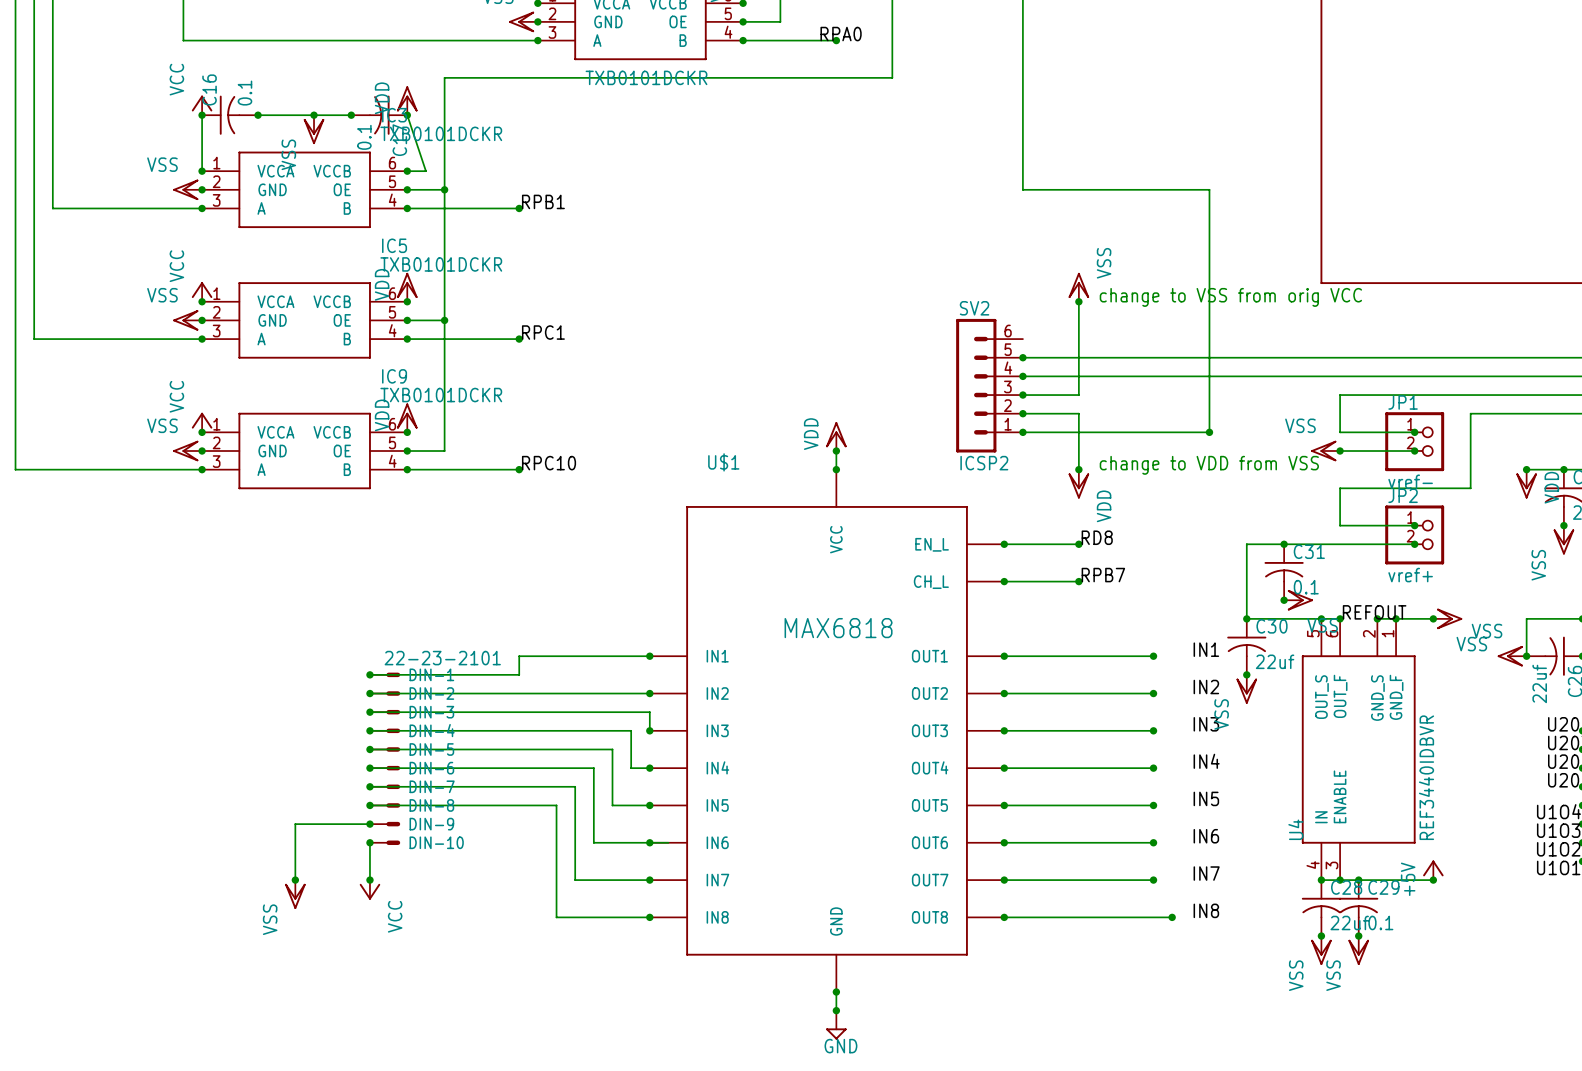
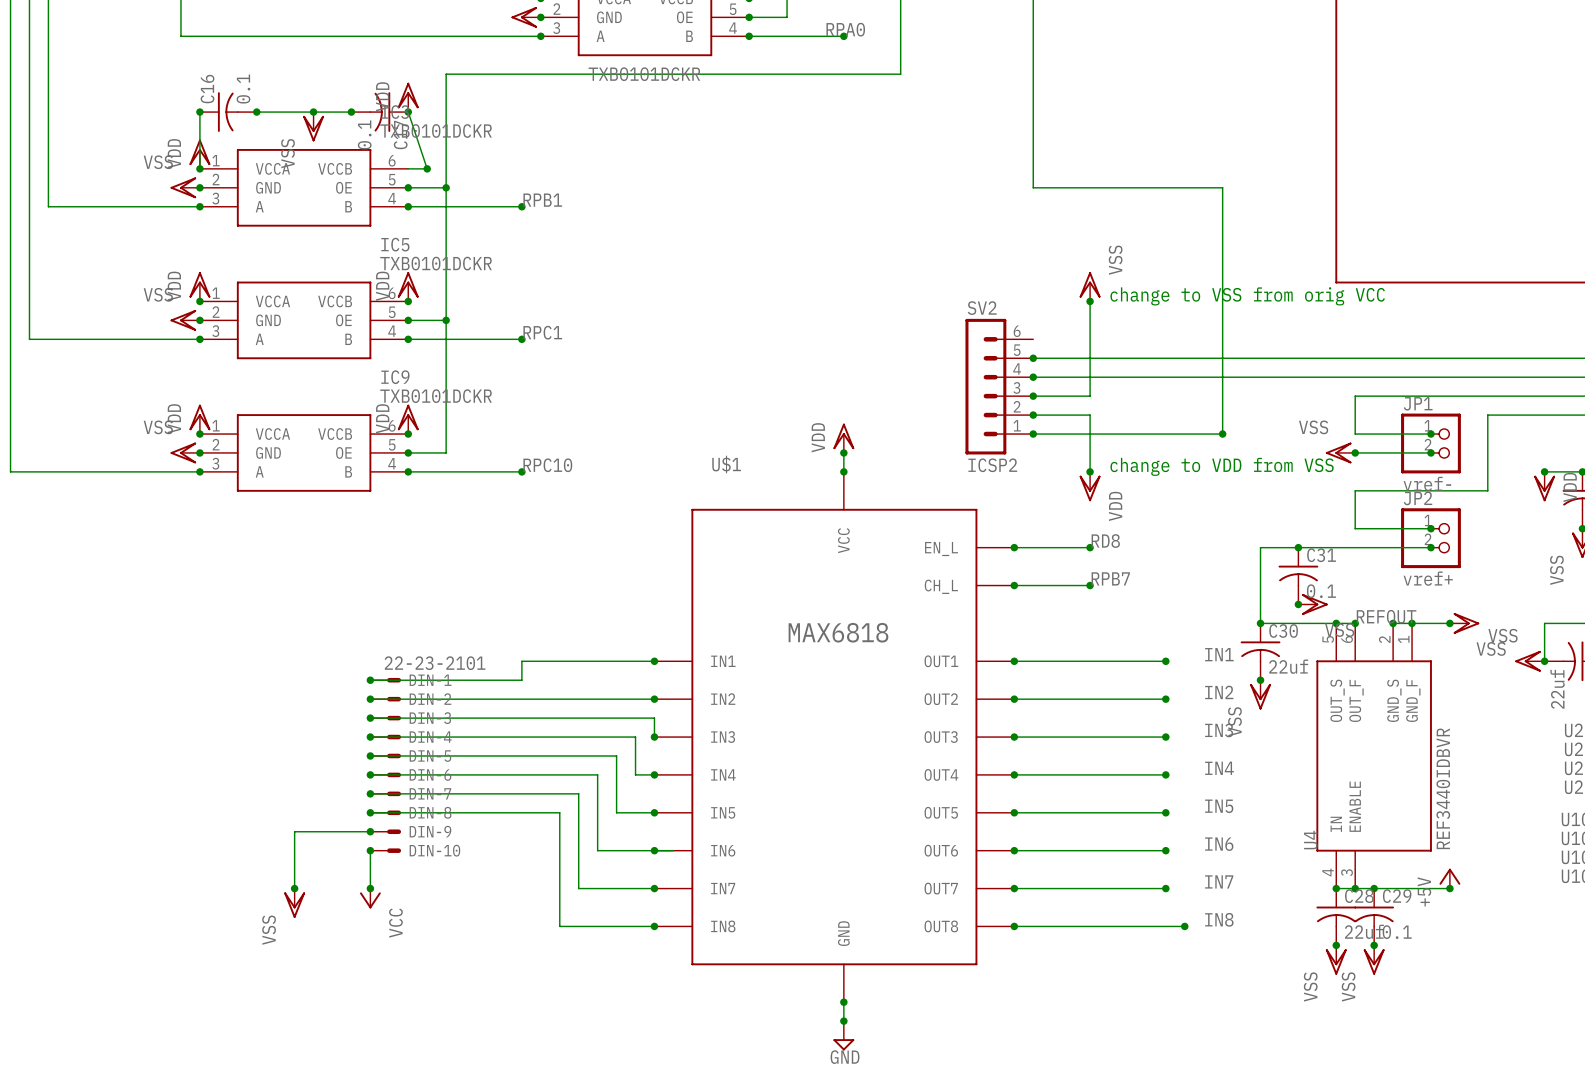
power symbol: VCC (202, 105) -> none
power symbol: none -> VDD (199, 154)
junction position: (407, 171) -> (427, 168)
power symbol: VCC (202, 291) -> VDD (199, 286)
power symbol: VCC (202, 422) -> VDD (199, 419)

